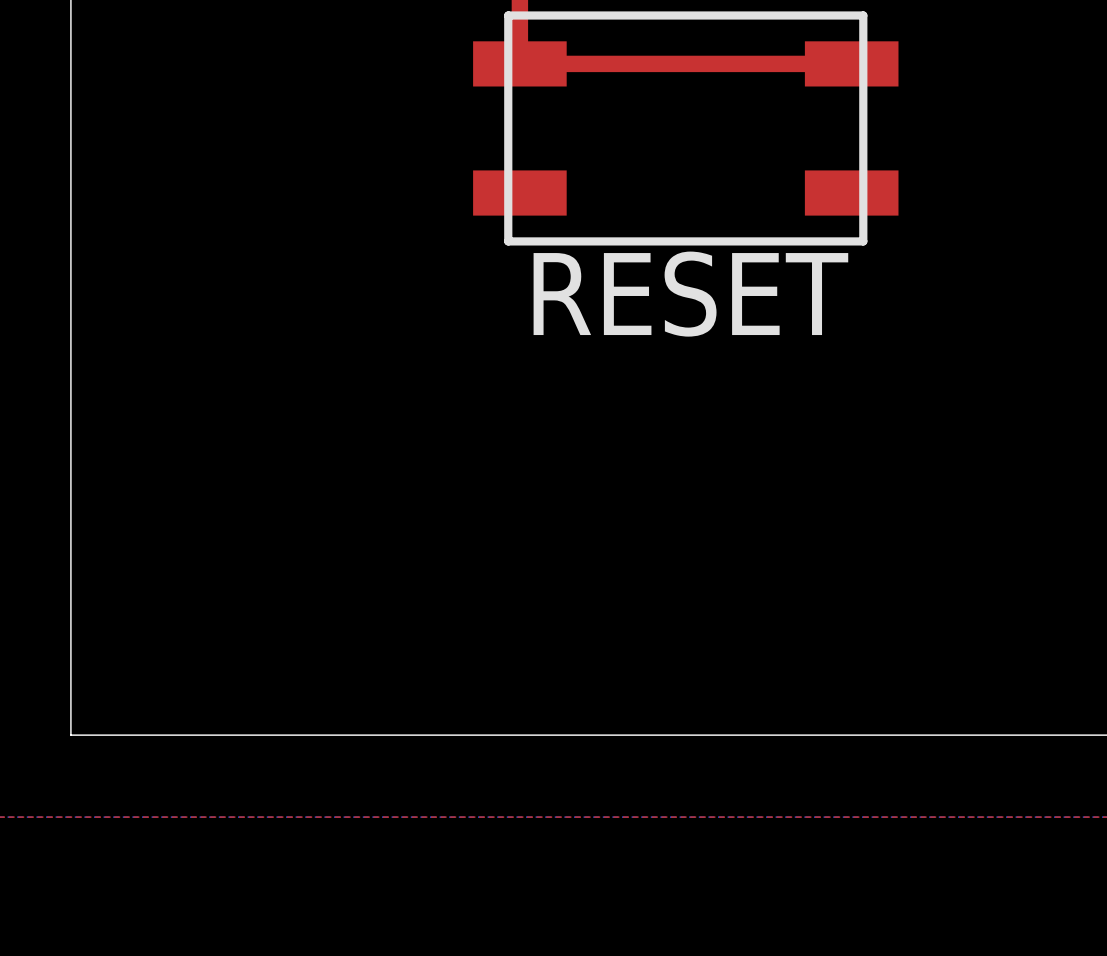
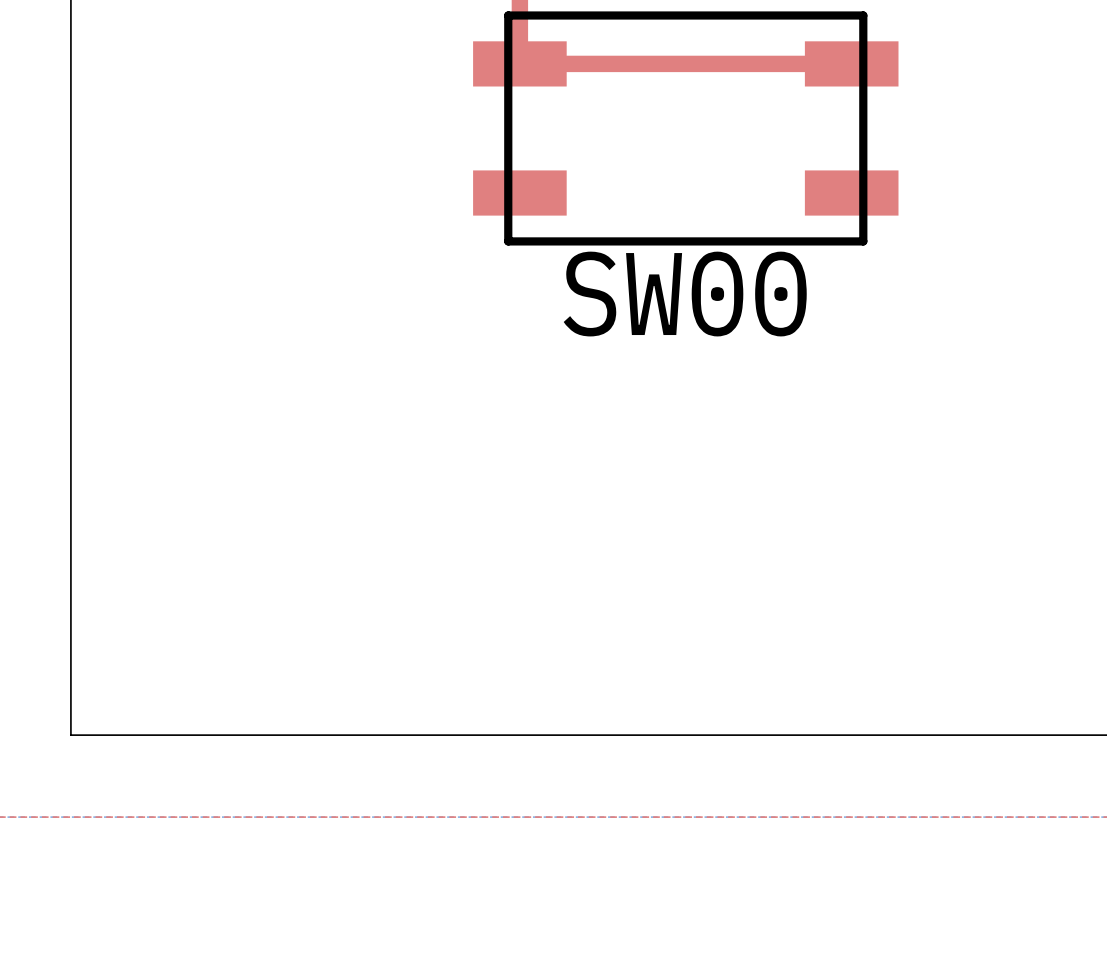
RESET name: RESET (690, 294) -> SW00 (685, 294)

